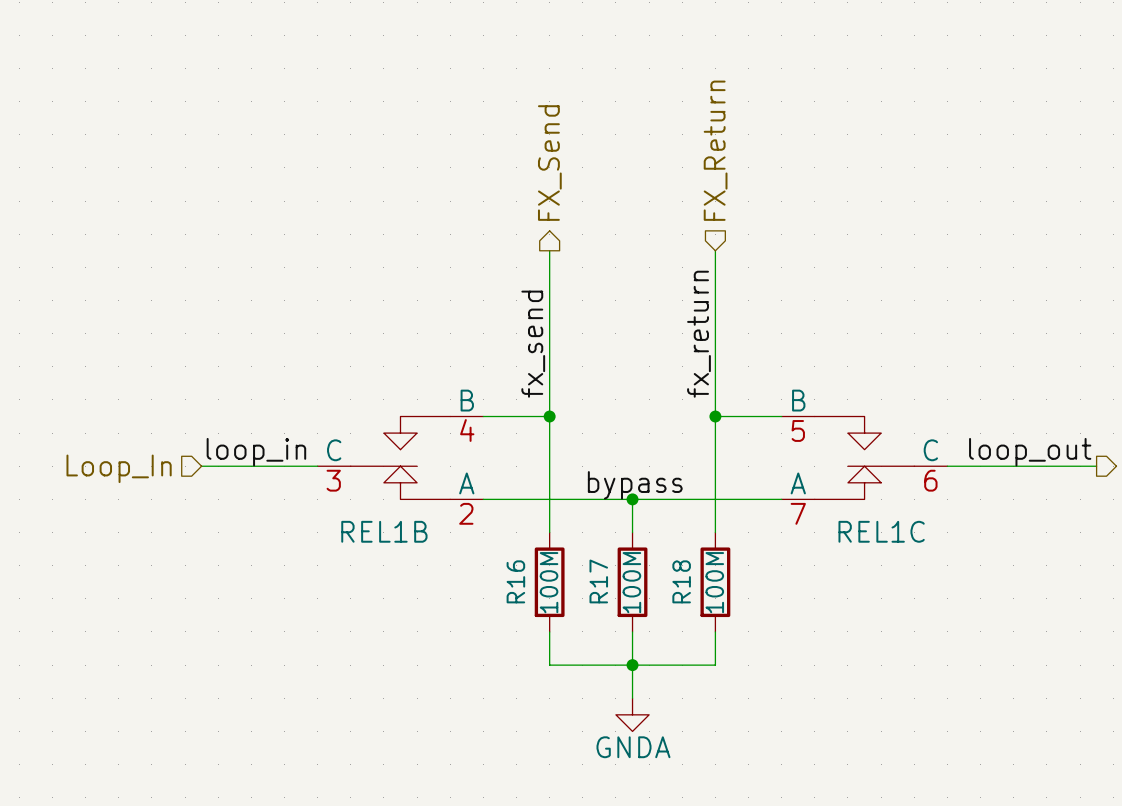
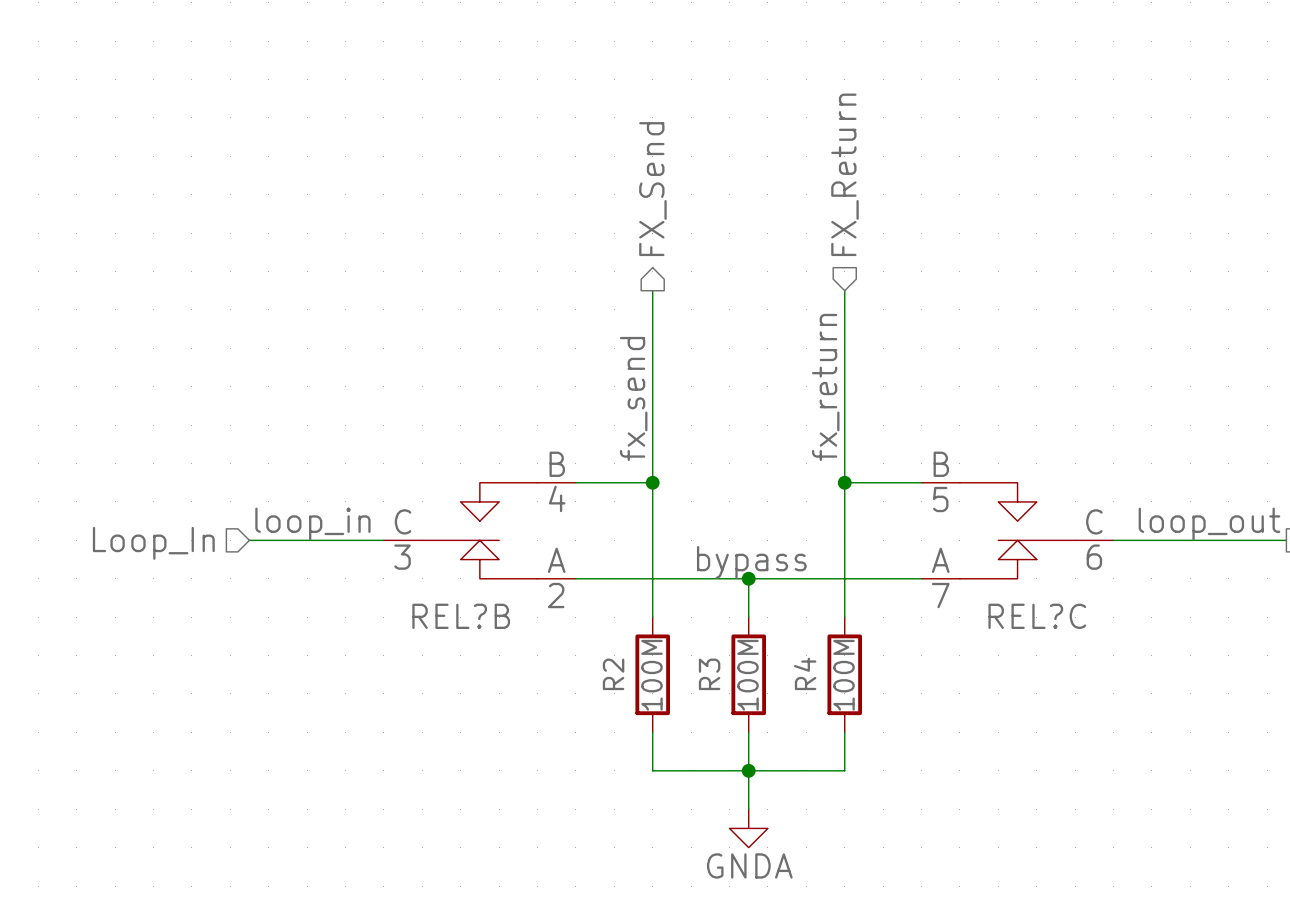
REL1B name: REL1B (384, 531) -> REL?B (461, 616)
REL1C name: REL1C (881, 531) -> REL?C (1037, 616)
R16 name: R16 (515, 581) -> R2 (613, 674)
R17 name: R17 (598, 581) -> R3 (709, 674)
R18 name: R18 (681, 581) -> R4 (805, 673)

